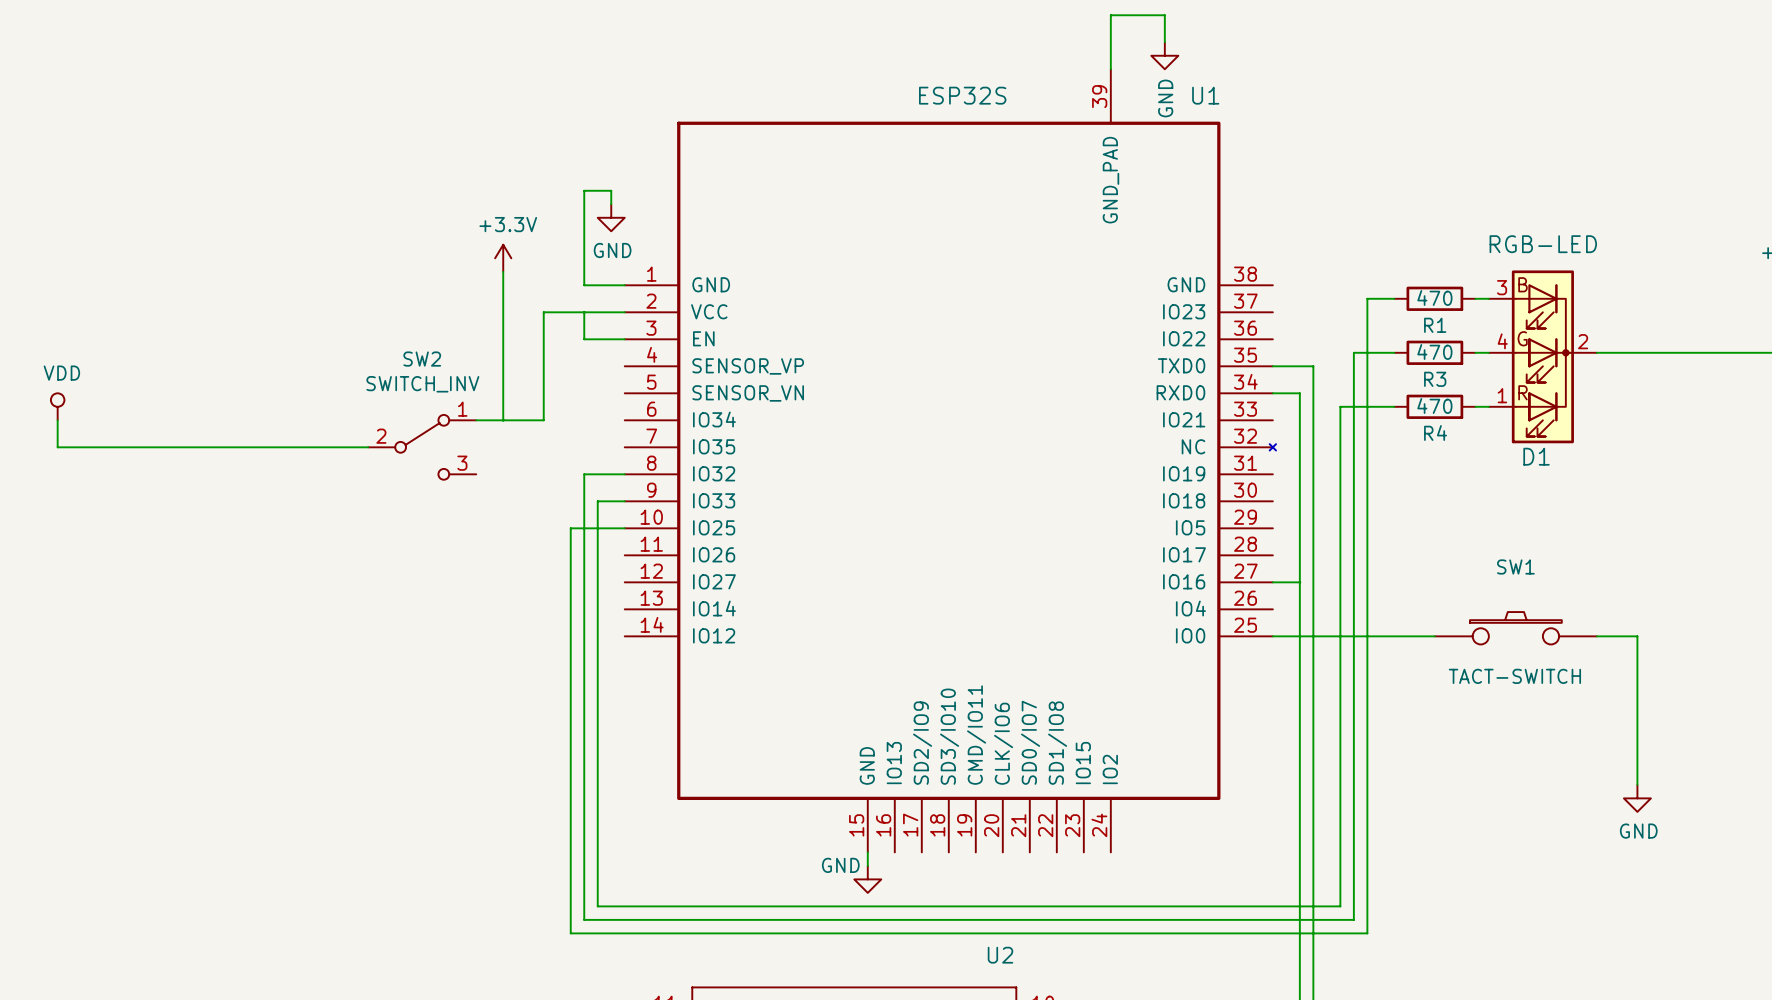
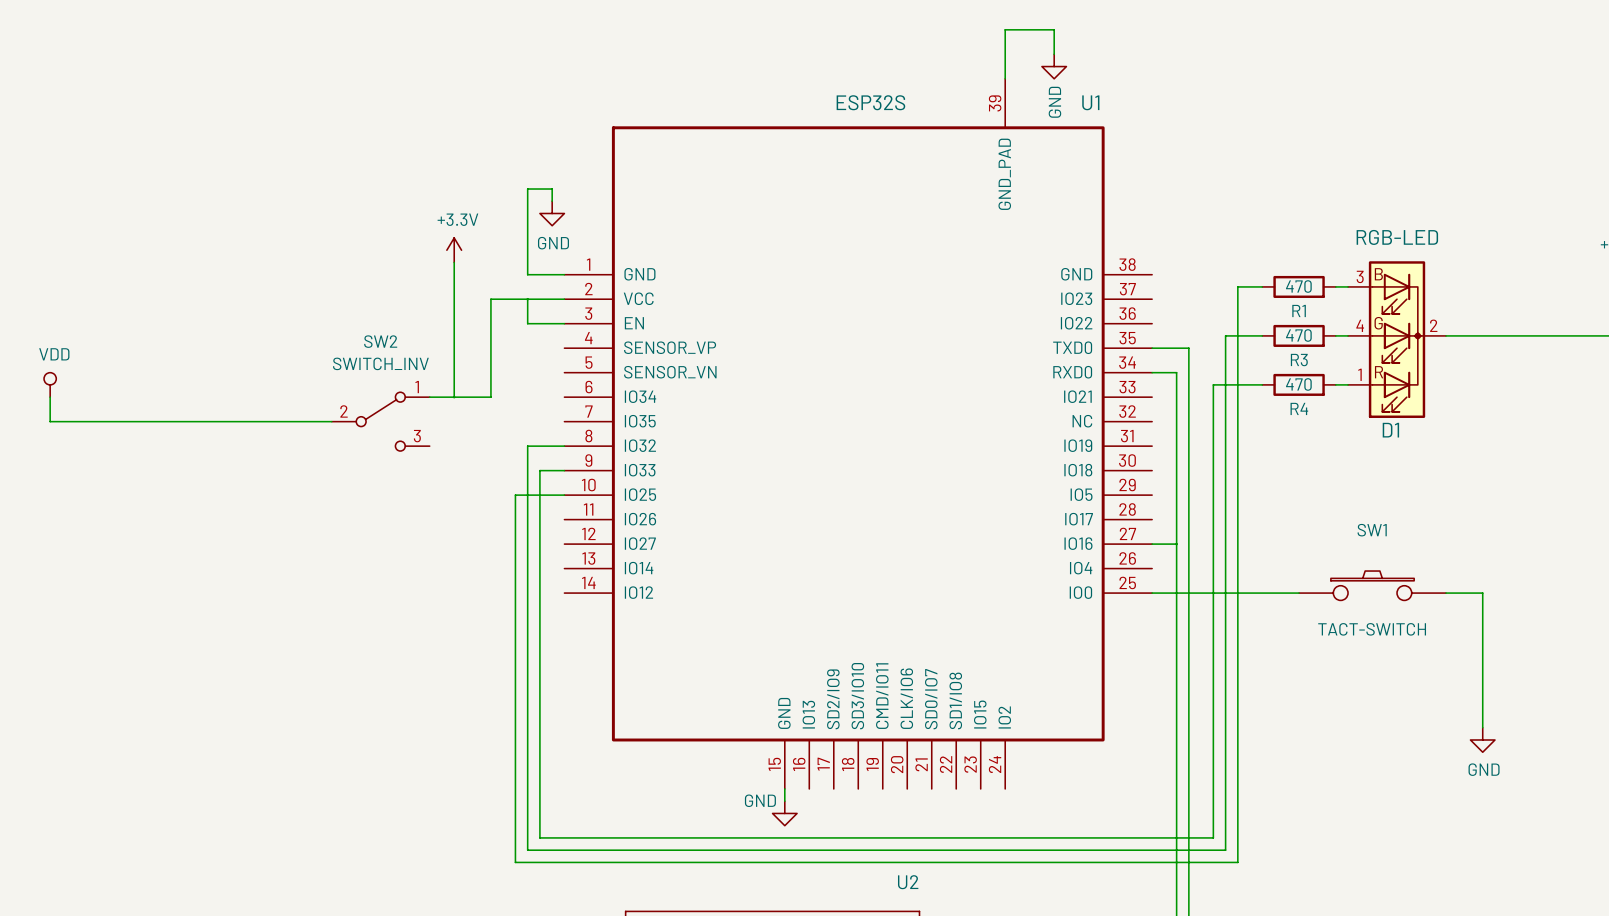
U1 symbol: [624, 69, 1277, 853] -> [564, 78, 1153, 789]

